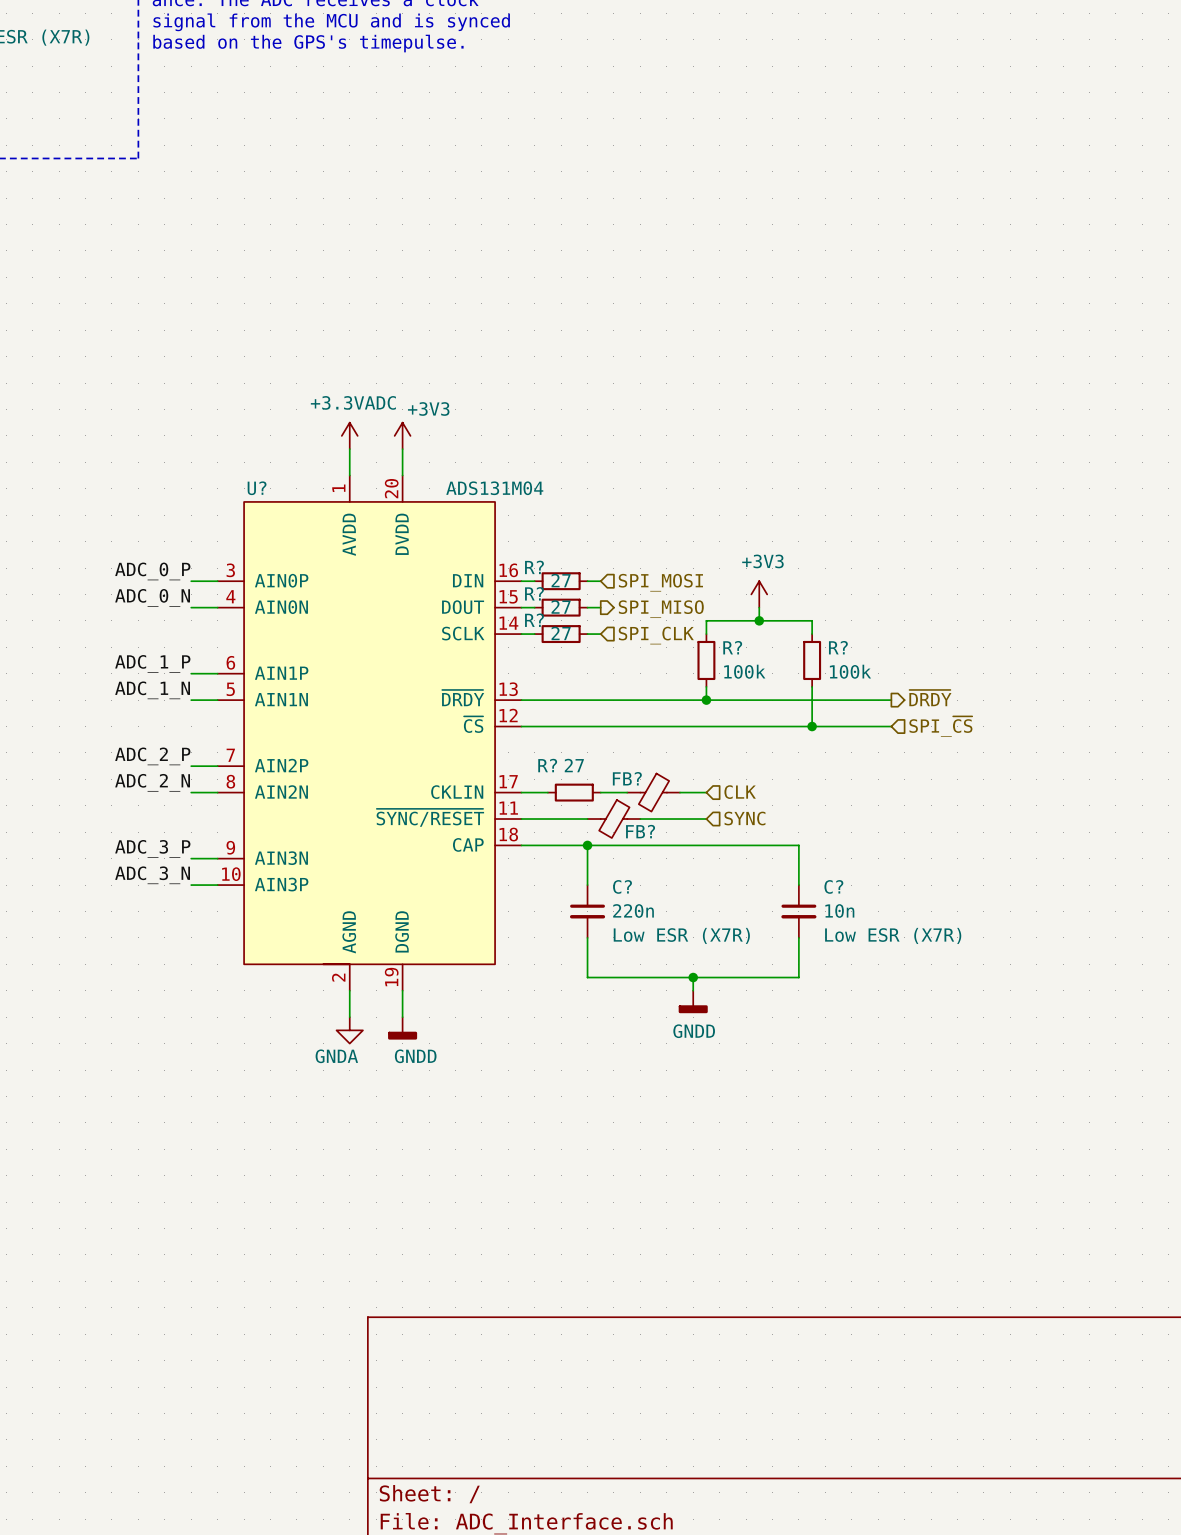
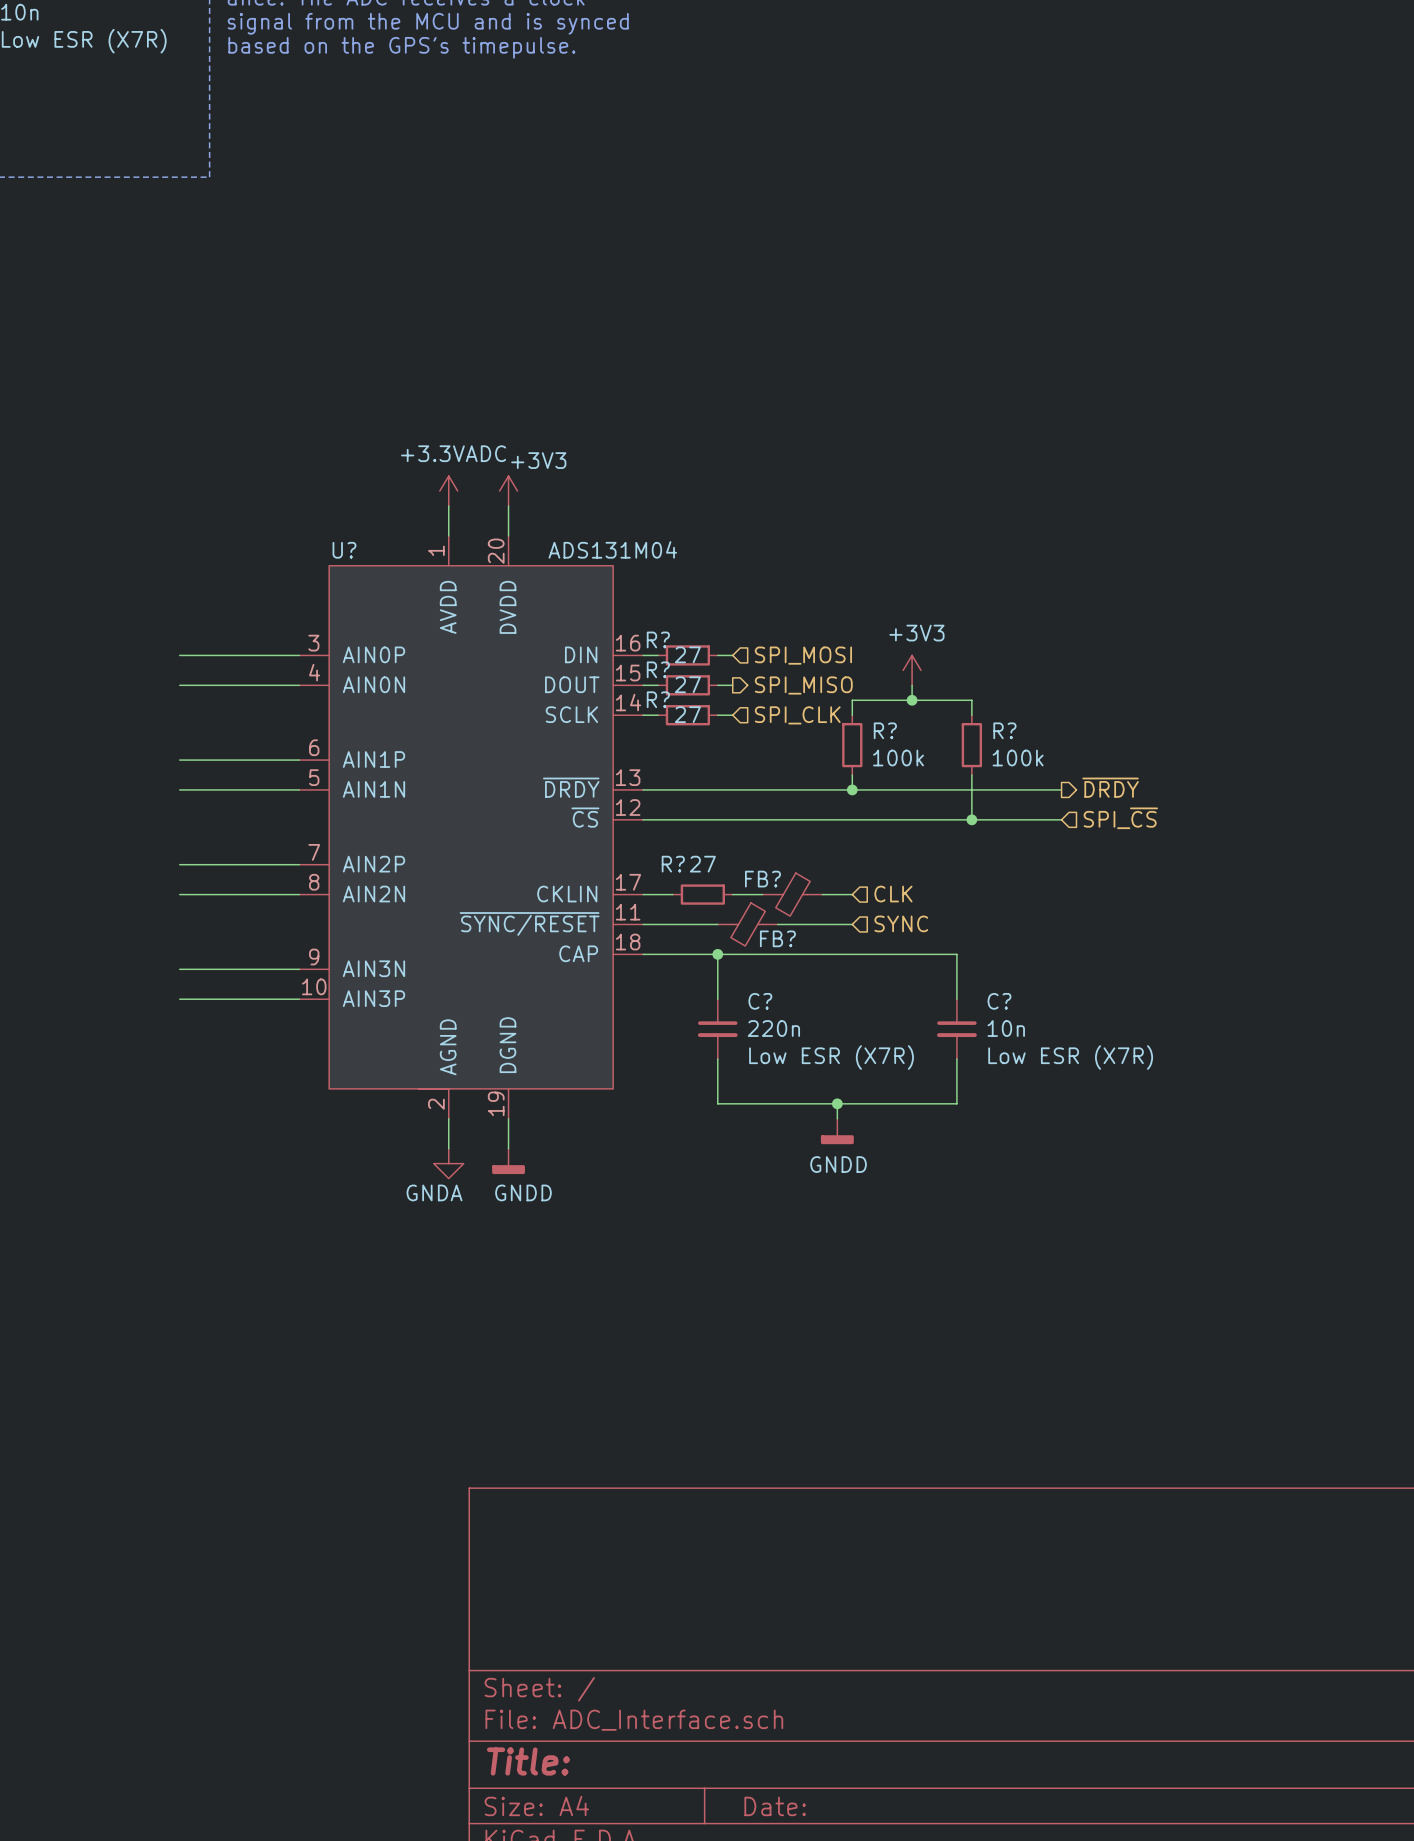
label: ADC_0_P (152, 571) -> none
wire: none -> (179, 655) (269, 655)
label: ADC_0_N (152, 597) -> none
wire: none -> (179, 685) (269, 685)
label: ADC_1_P (152, 663) -> none
wire: none -> (179, 760) (269, 760)
label: ADC_1_N (152, 690) -> none
wire: none -> (179, 789) (269, 789)
label: ADC_2_P (152, 756) -> none
wire: none -> (179, 864) (269, 864)
label: ADC_2_N (152, 782) -> none
wire: none -> (179, 894) (269, 894)
label: ADC_3_P (152, 848) -> none
wire: none -> (179, 969) (269, 969)
label: ADC_3_N (152, 875) -> none
wire: none -> (179, 999) (269, 999)

